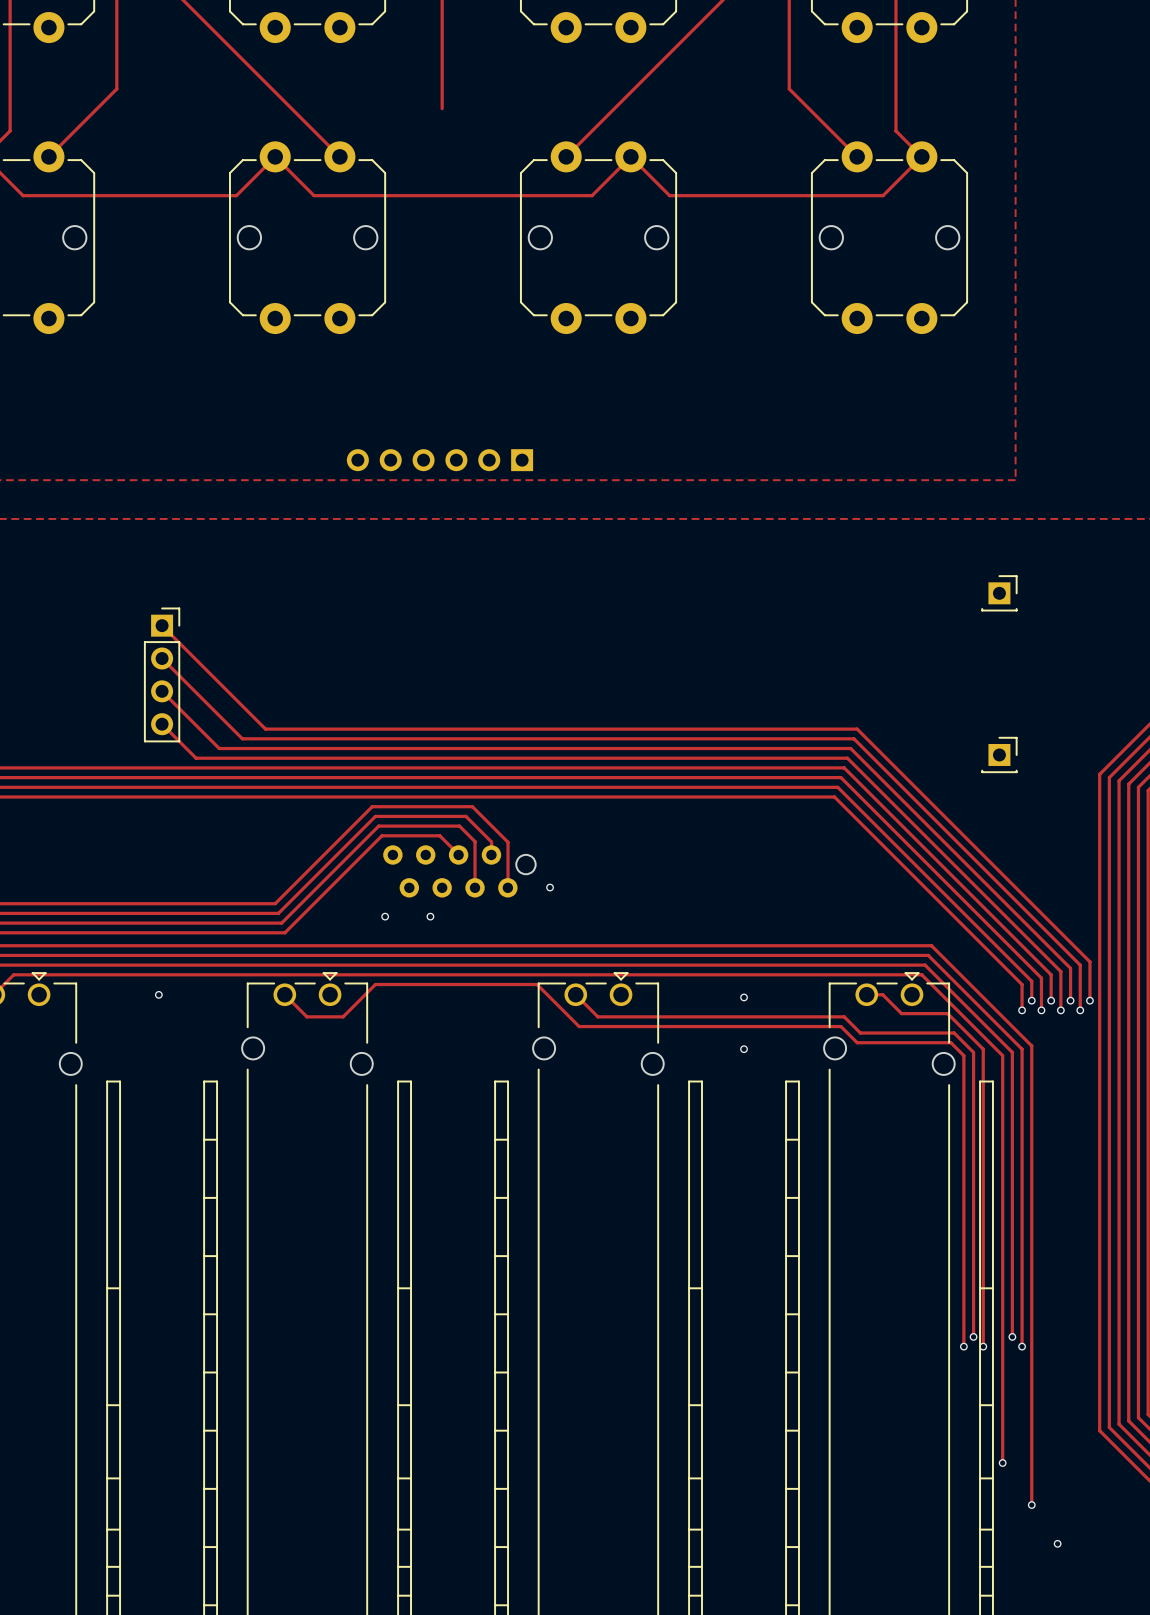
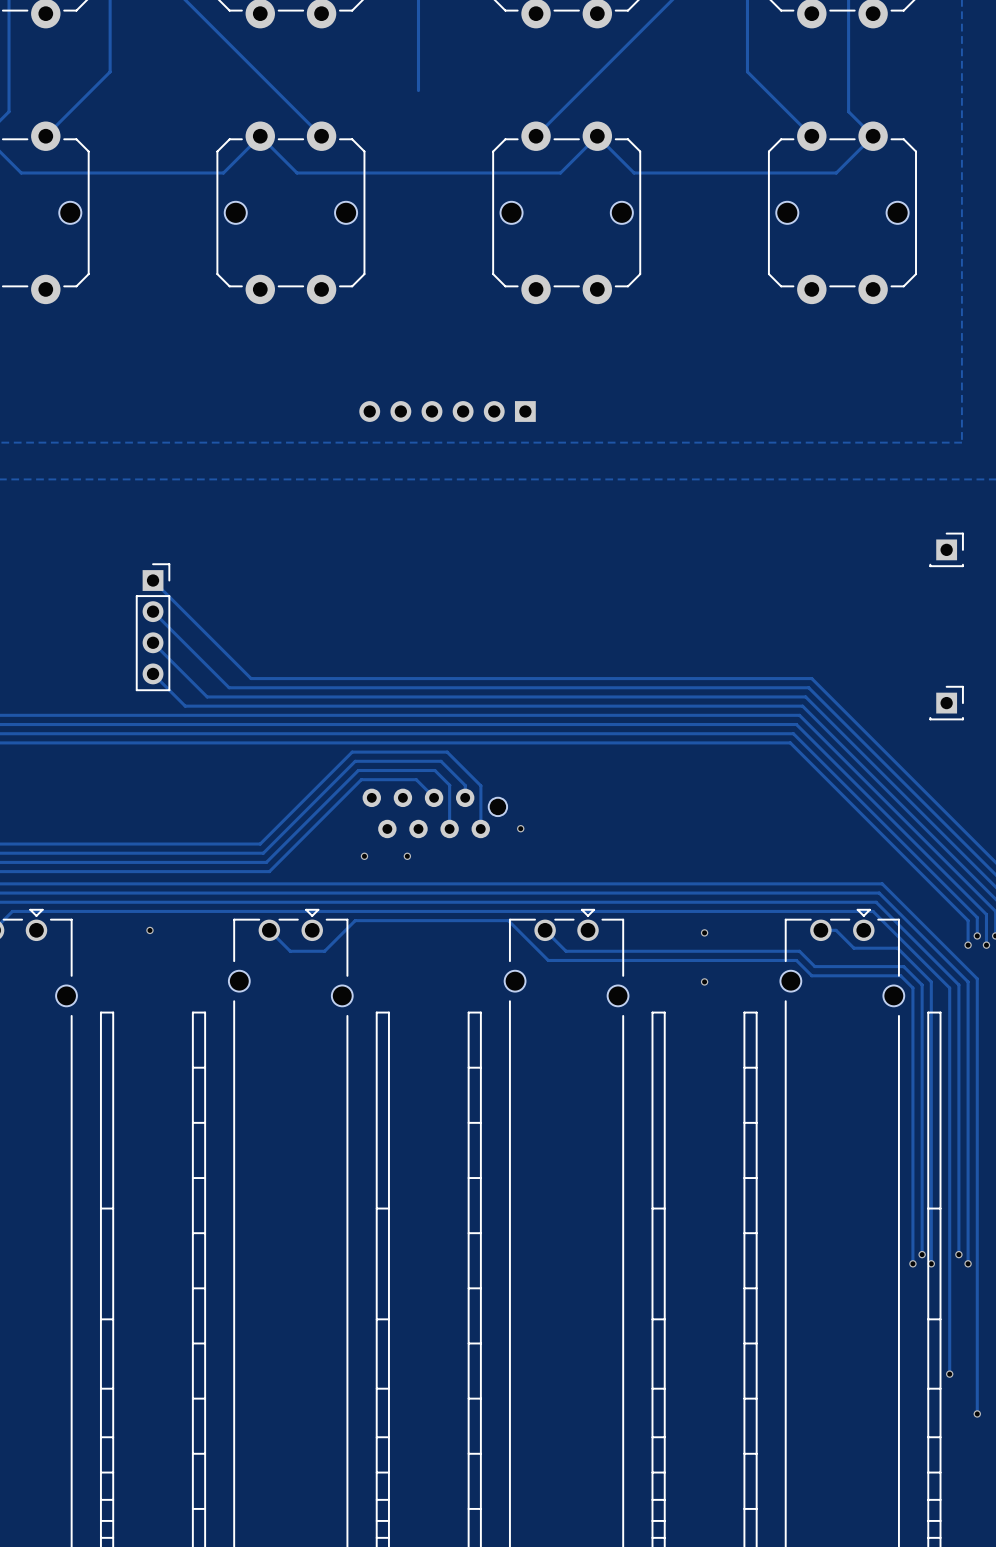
part position: (439, 460) -> (447, 411)

